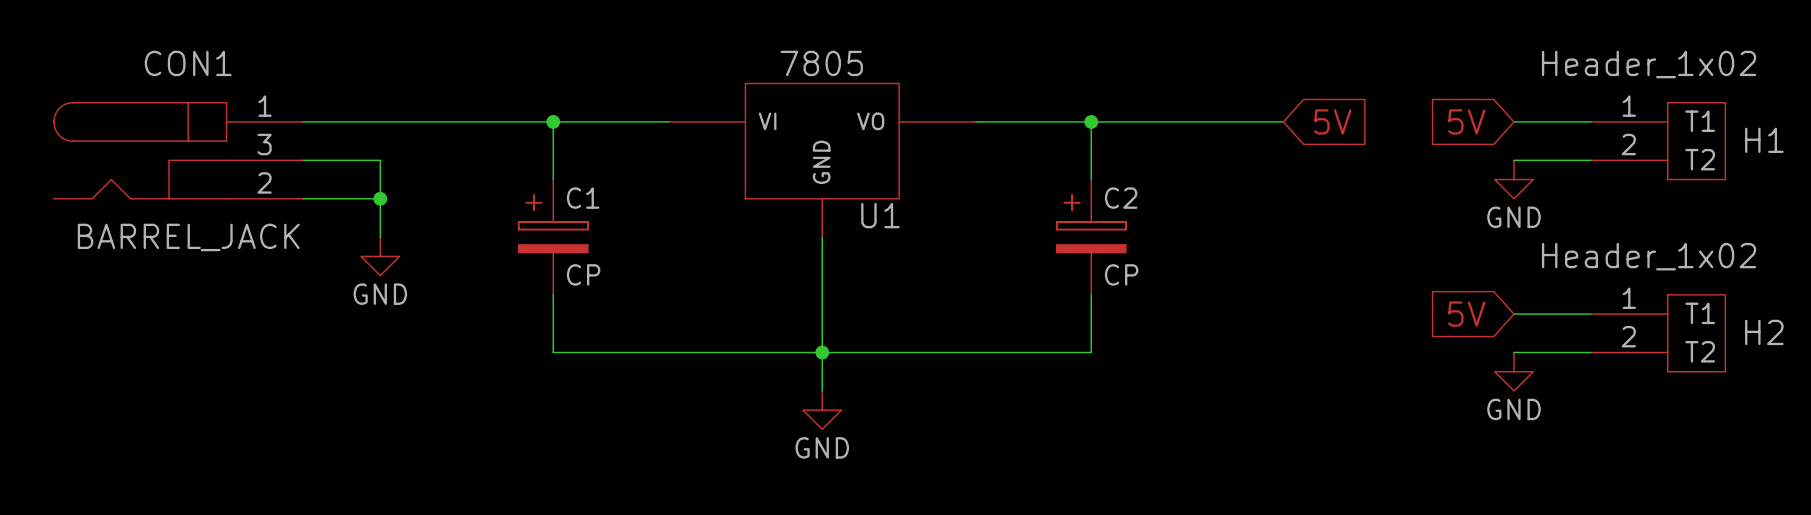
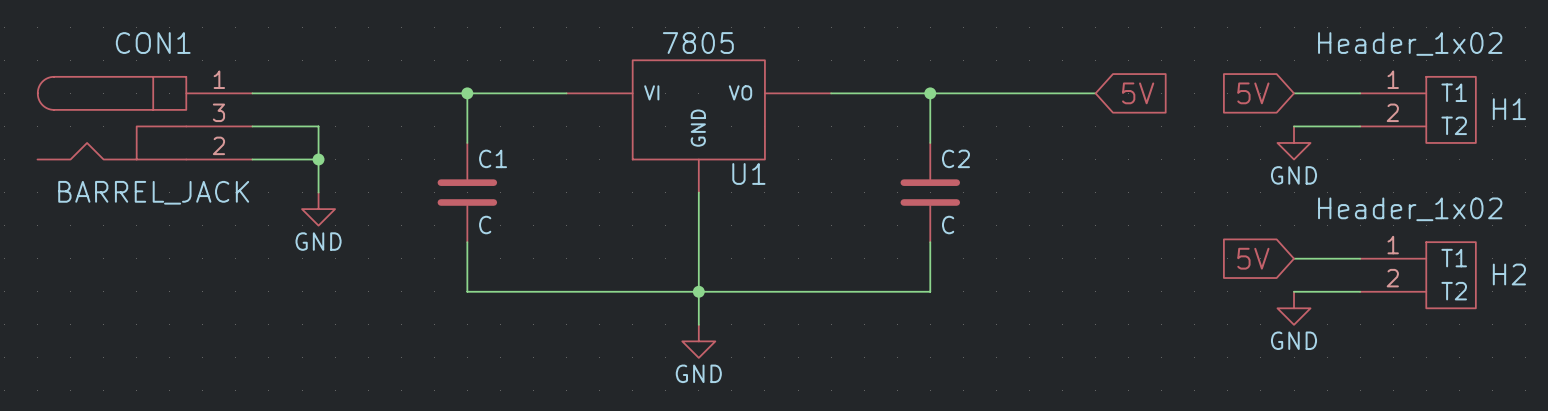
C1 symbol: [518, 179, 588, 295] -> [437, 142, 498, 243]
C2 symbol: [1056, 179, 1126, 295] -> [900, 142, 961, 243]
C1 value: CP (583, 274) -> C (485, 225)
C2 value: CP (1121, 274) -> C (948, 225)

